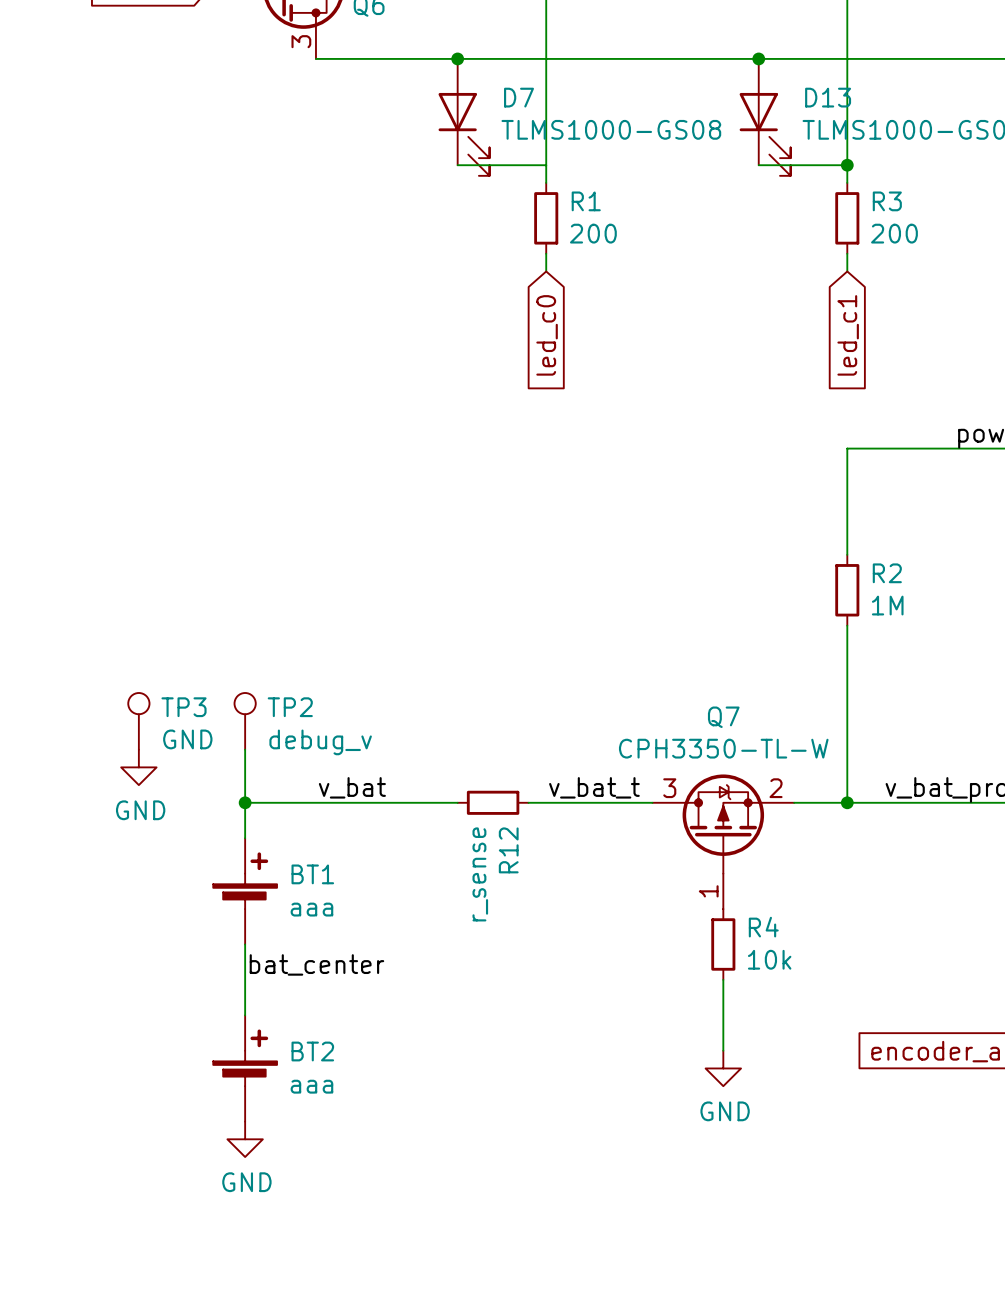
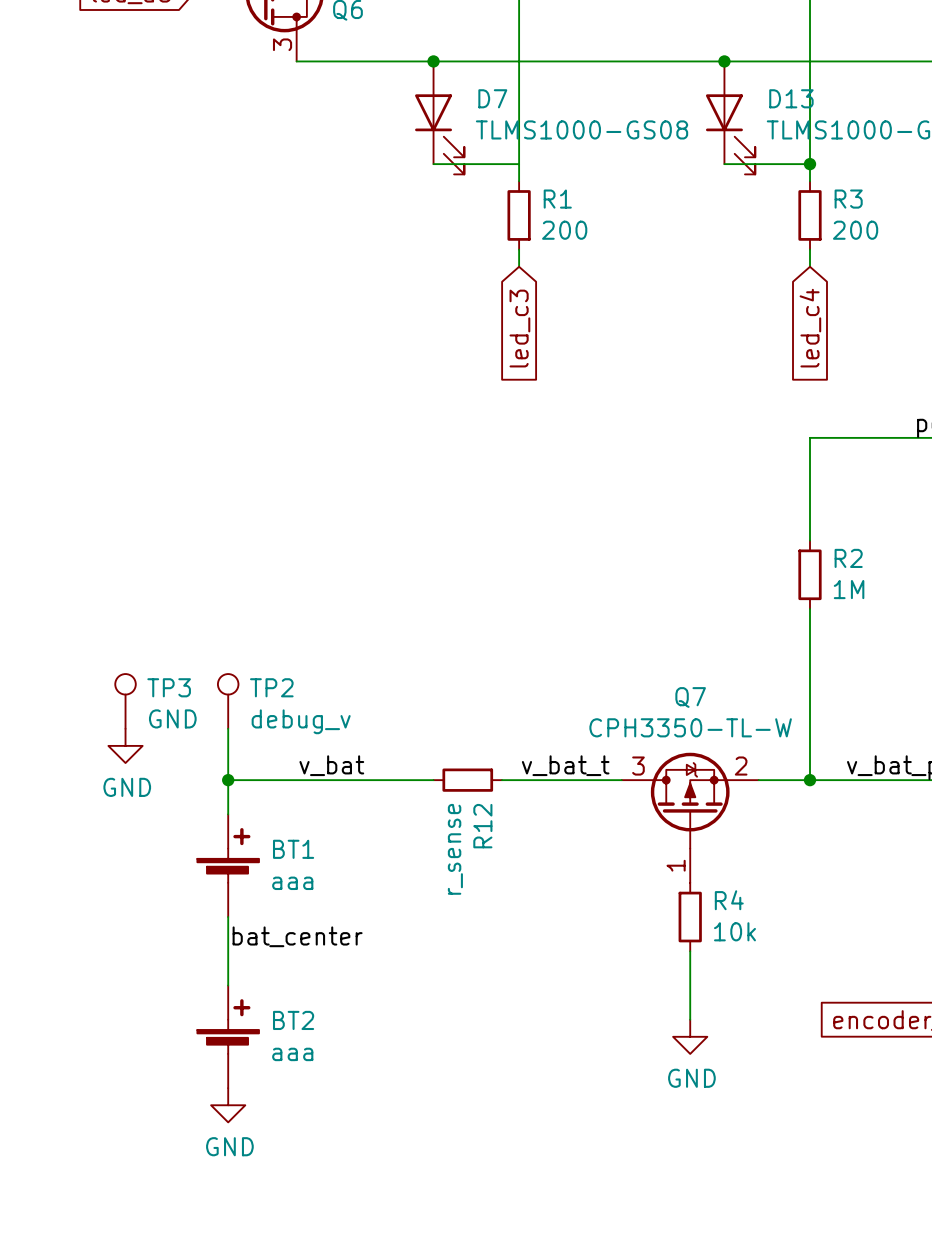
global label: led_c0 (547, 335) -> led_c3 (519, 328)
global label: led_c1 (848, 335) -> led_c4 (810, 328)

